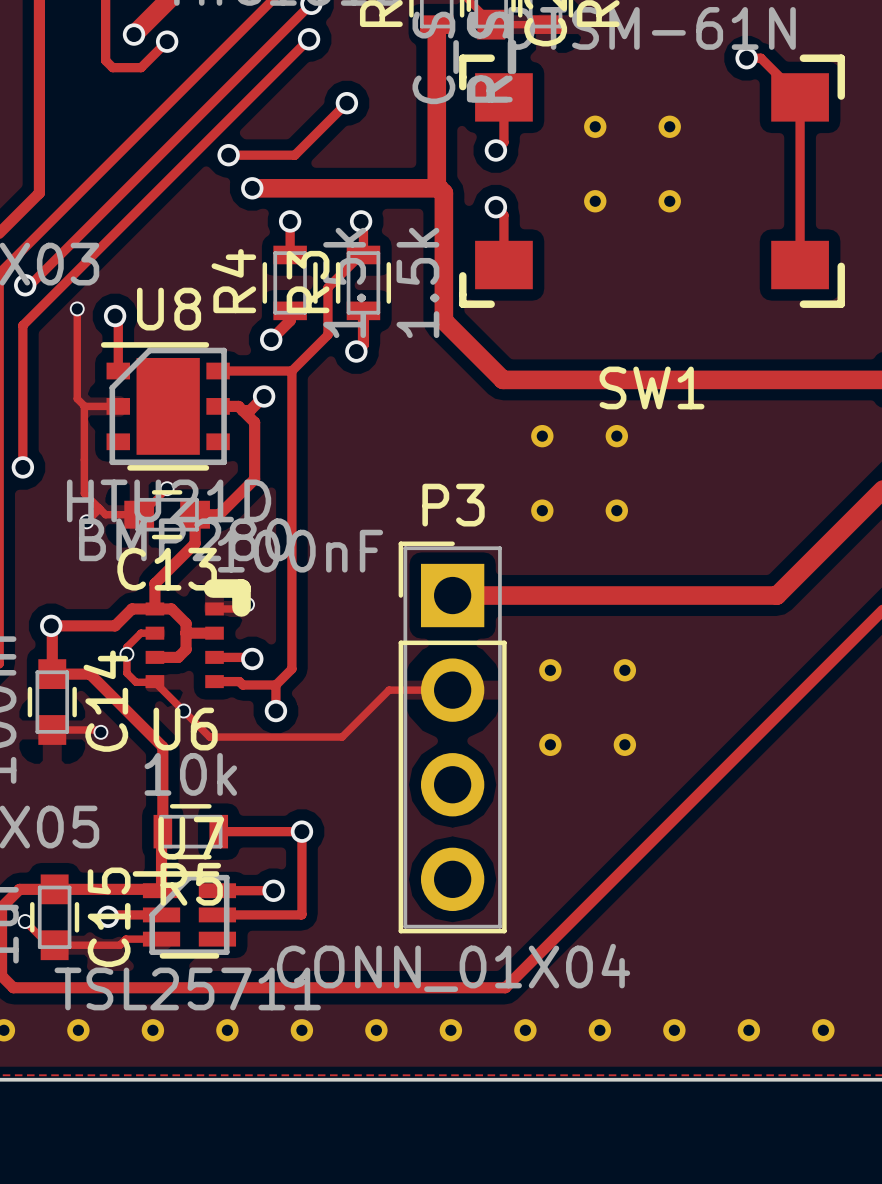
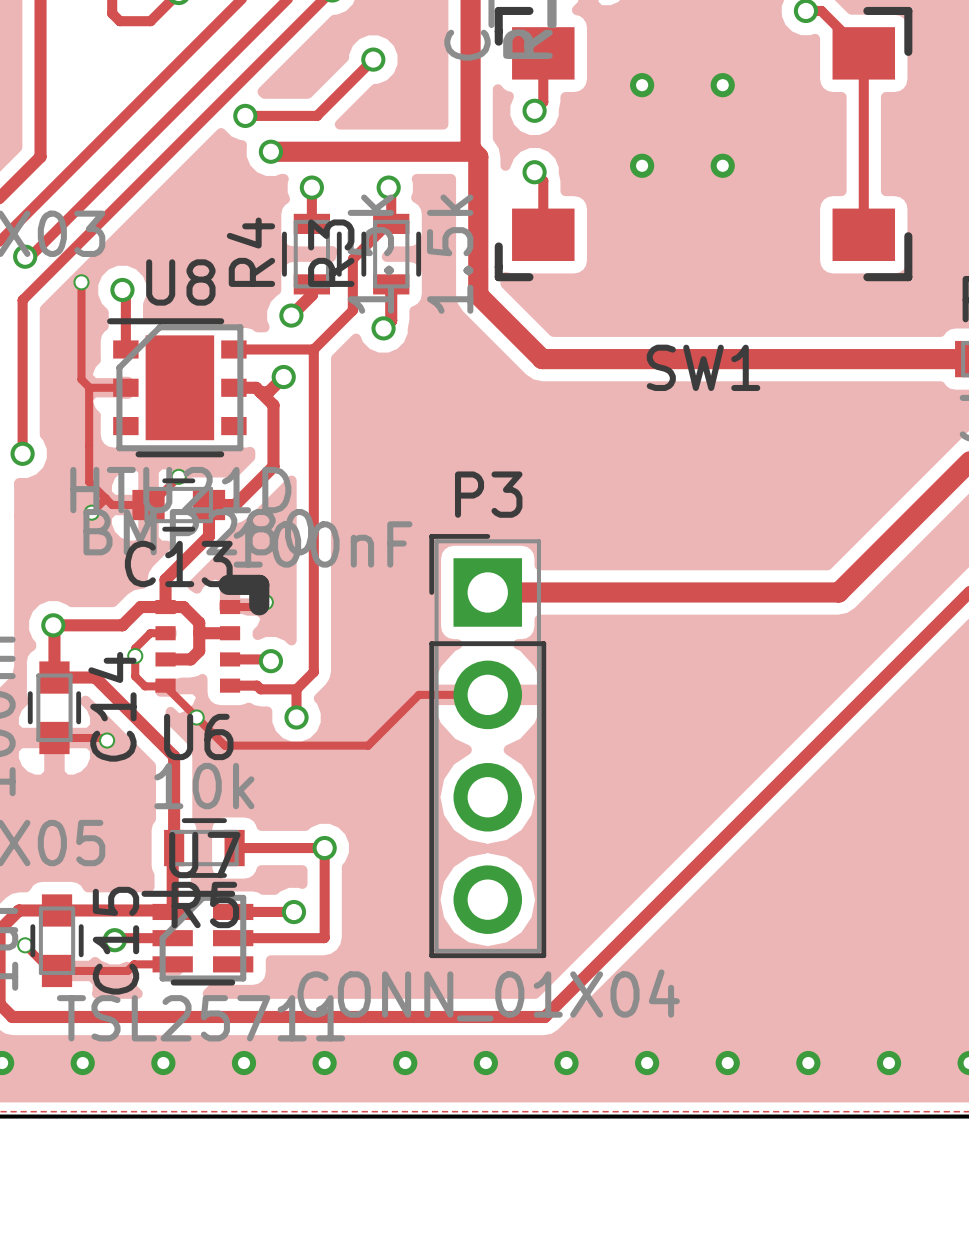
part: (542, 436) -> none
part: (616, 436) -> none
part: (542, 510) -> none
part: (616, 510) -> none
part: (550, 670) -> none
part: (624, 670) -> none
part: (550, 744) -> none
part: (624, 744) -> none

